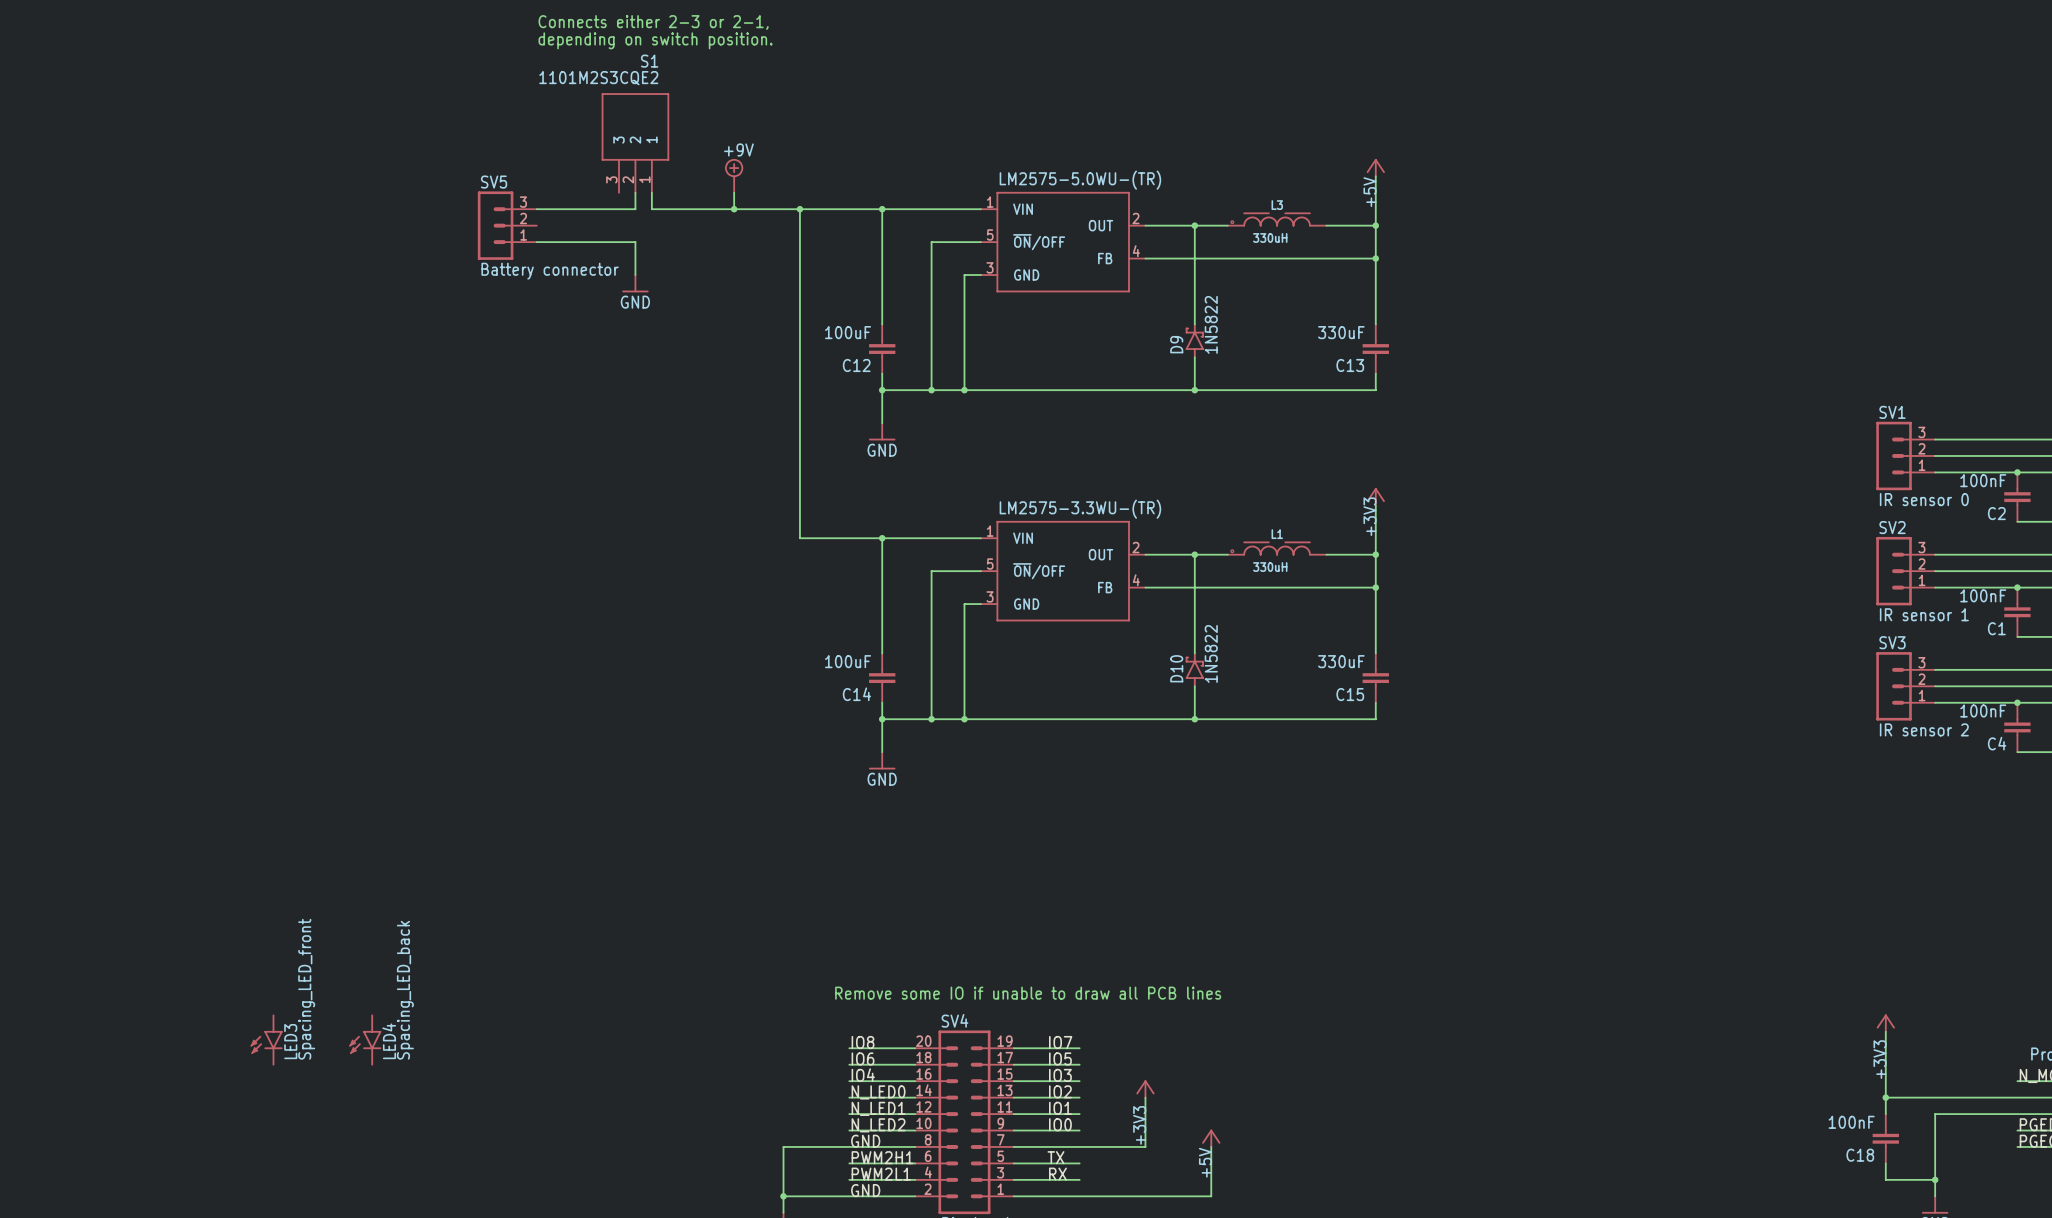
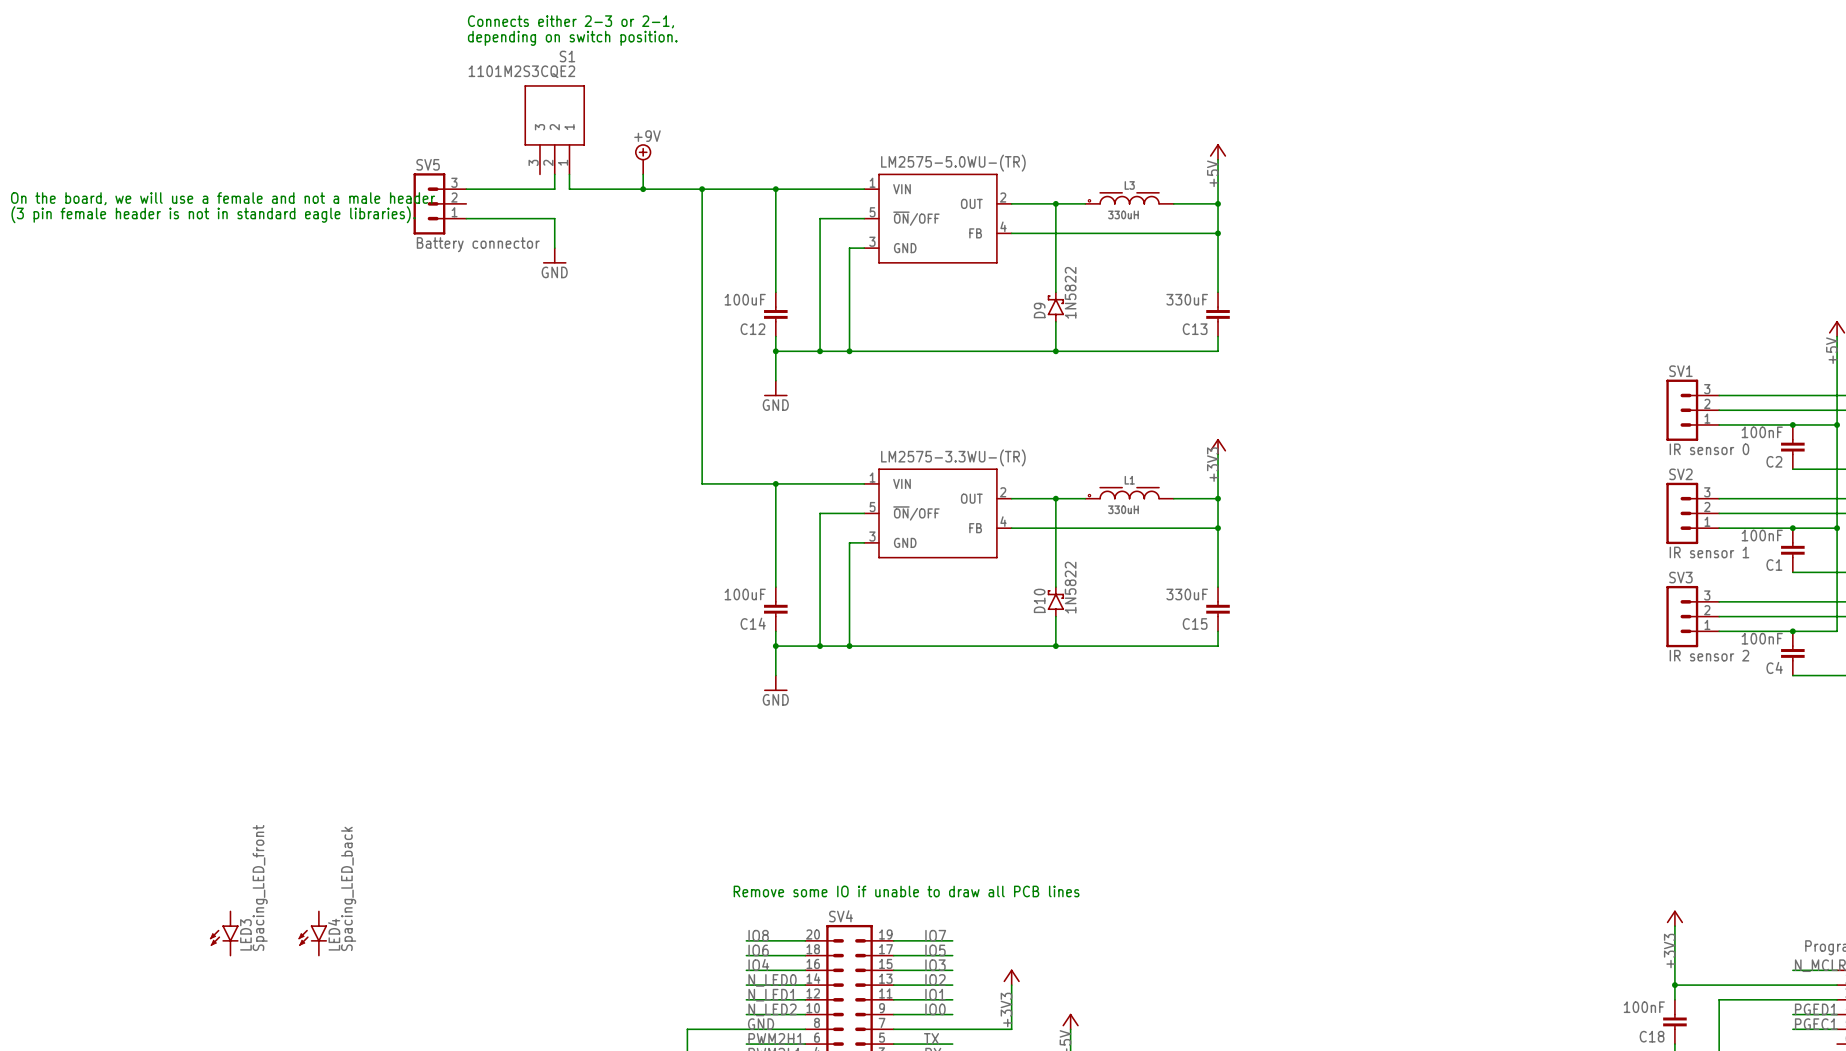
text: none -> On the board, we will use a female and not a male header (223, 198)
text: none -> (3 pin female header is not in standard eagle libraries). (213, 214)

